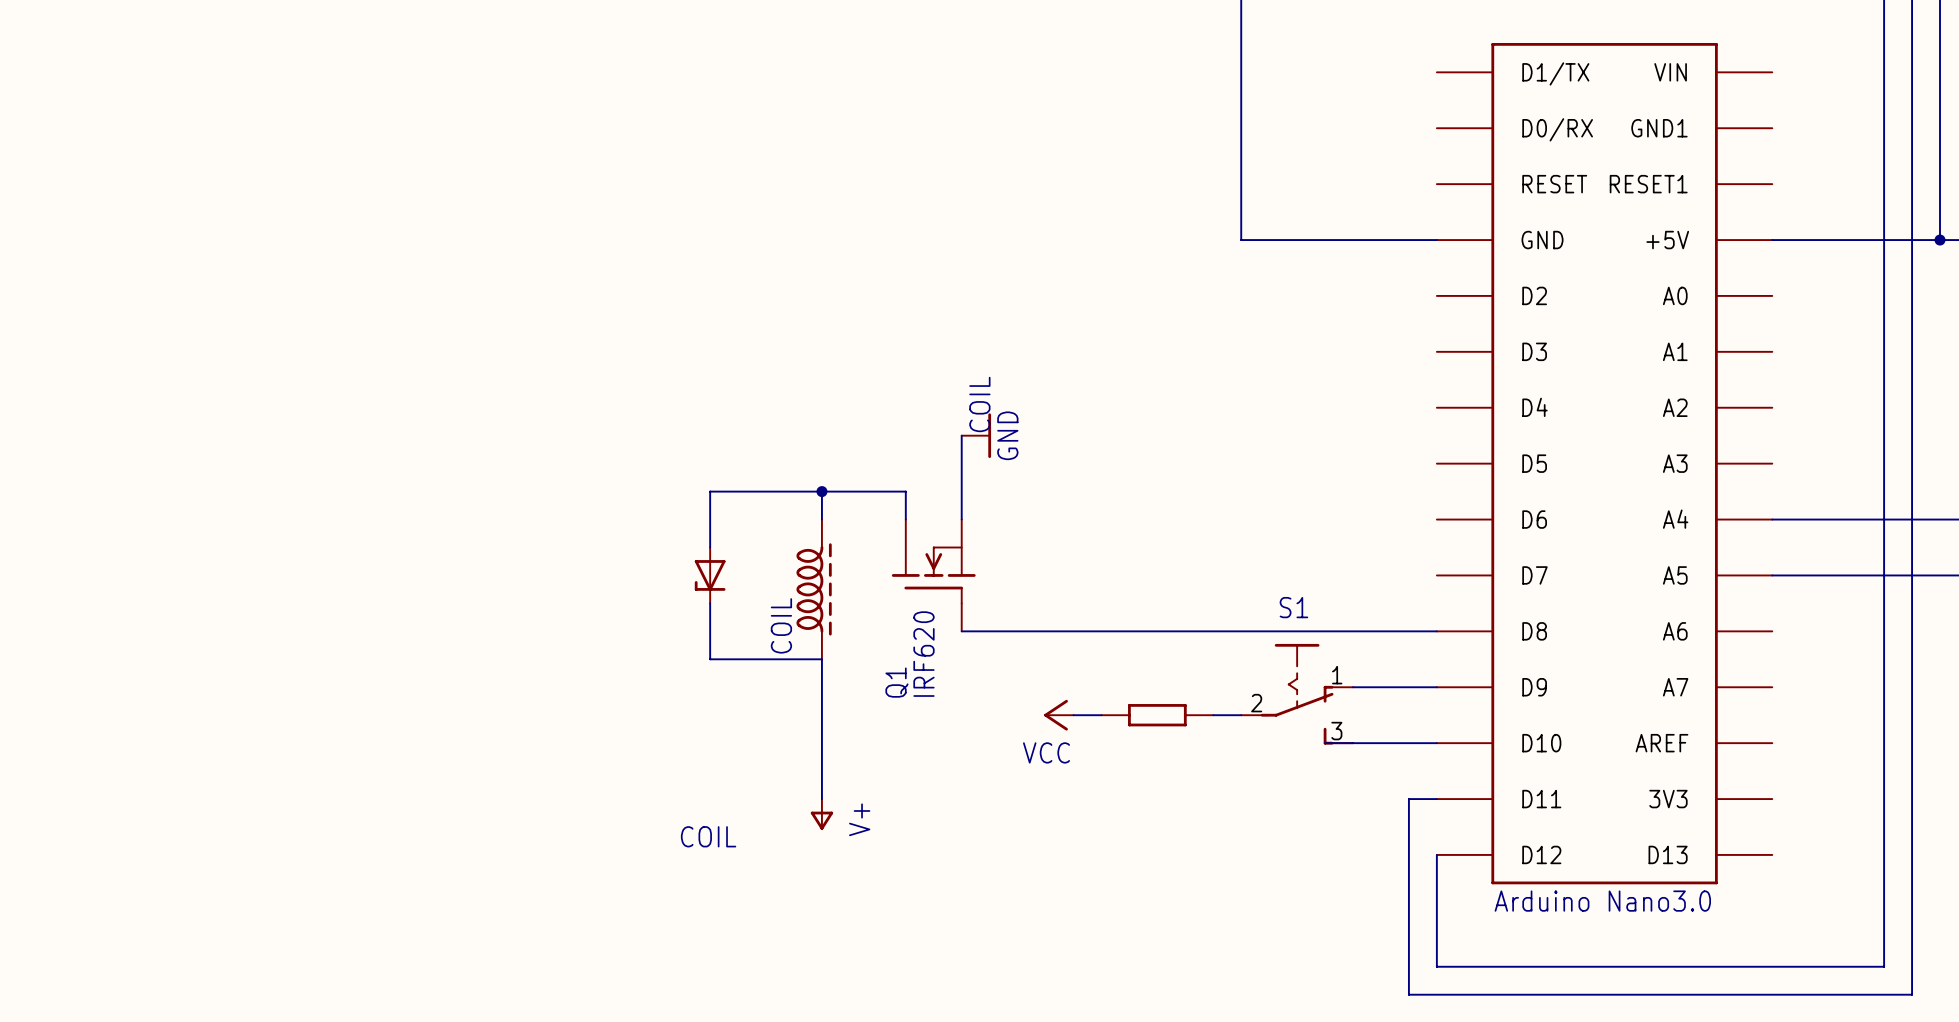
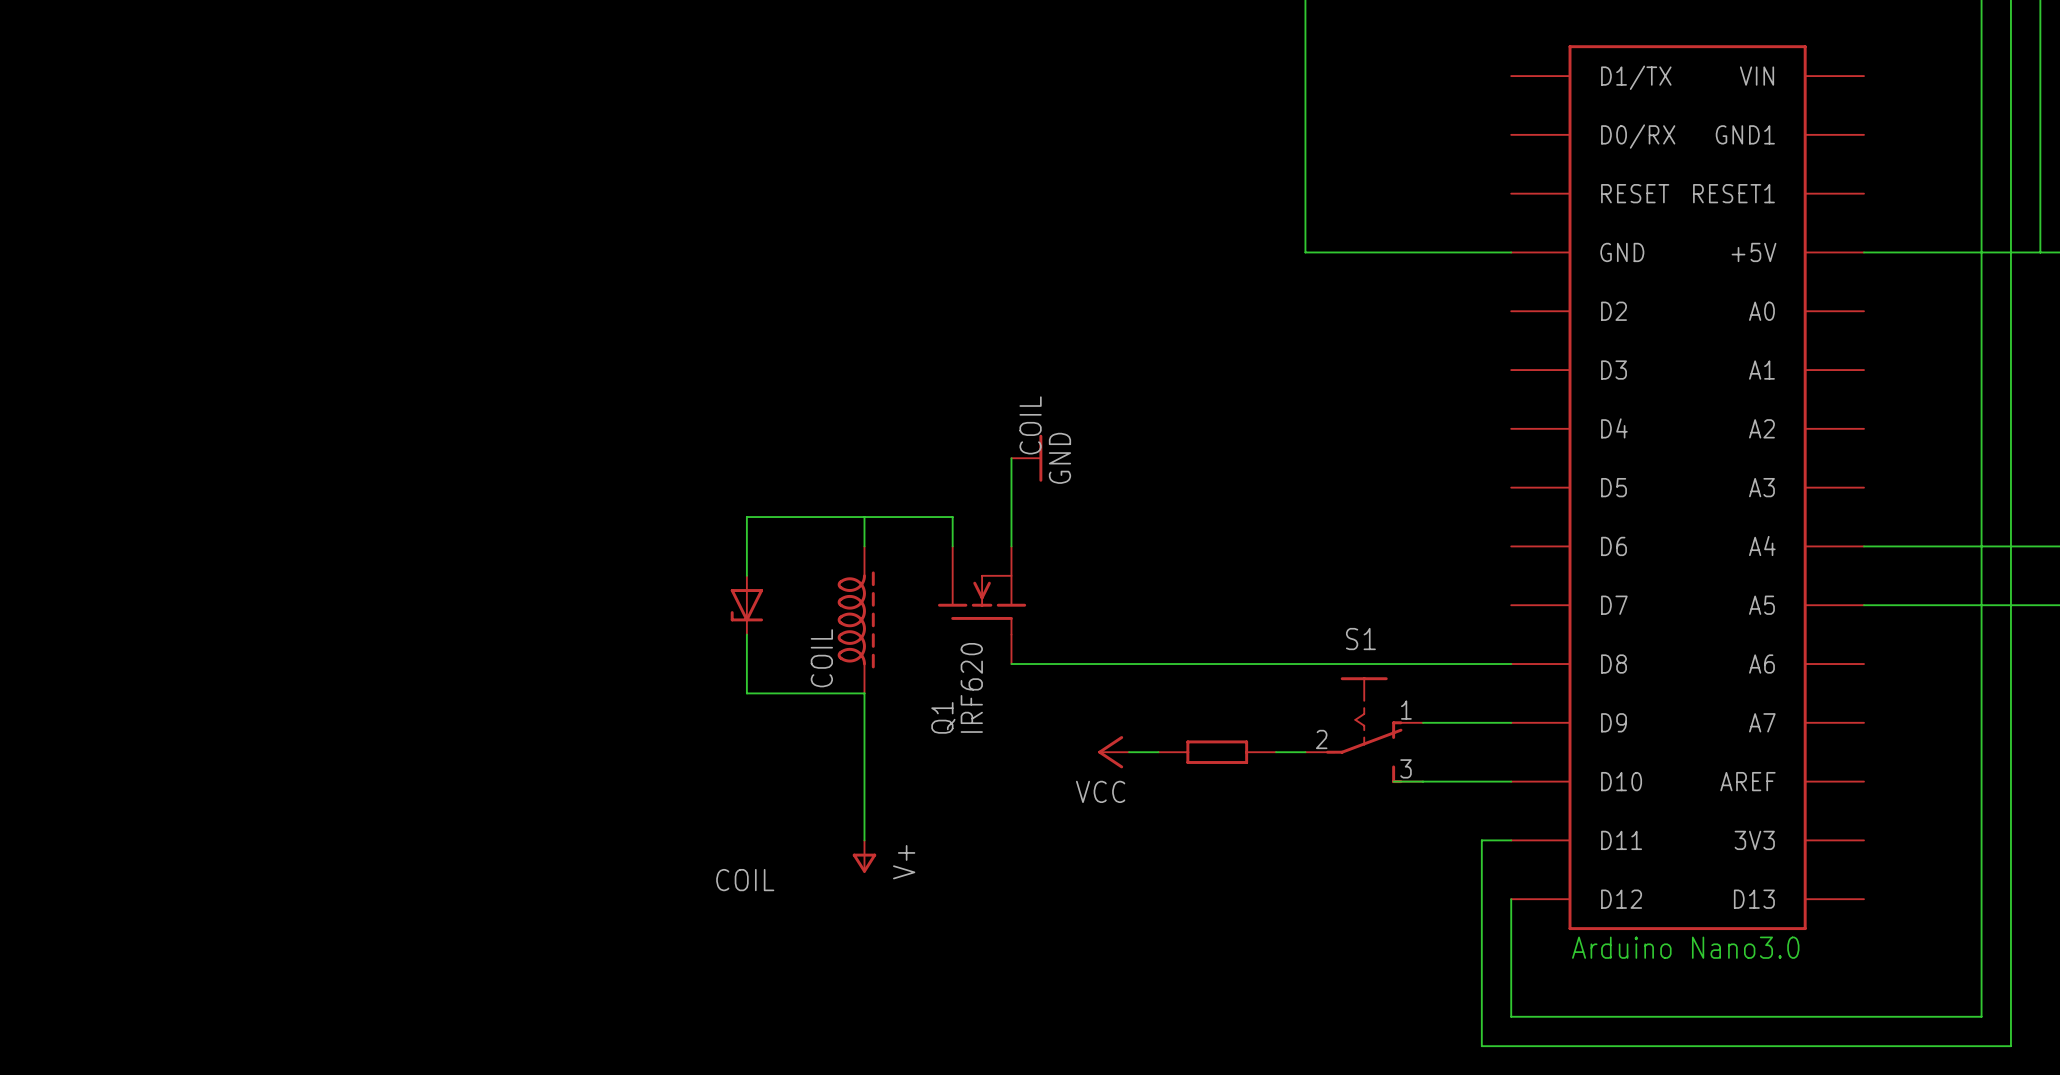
junction: (1939, 240) -> none
junction: (821, 491) -> none

